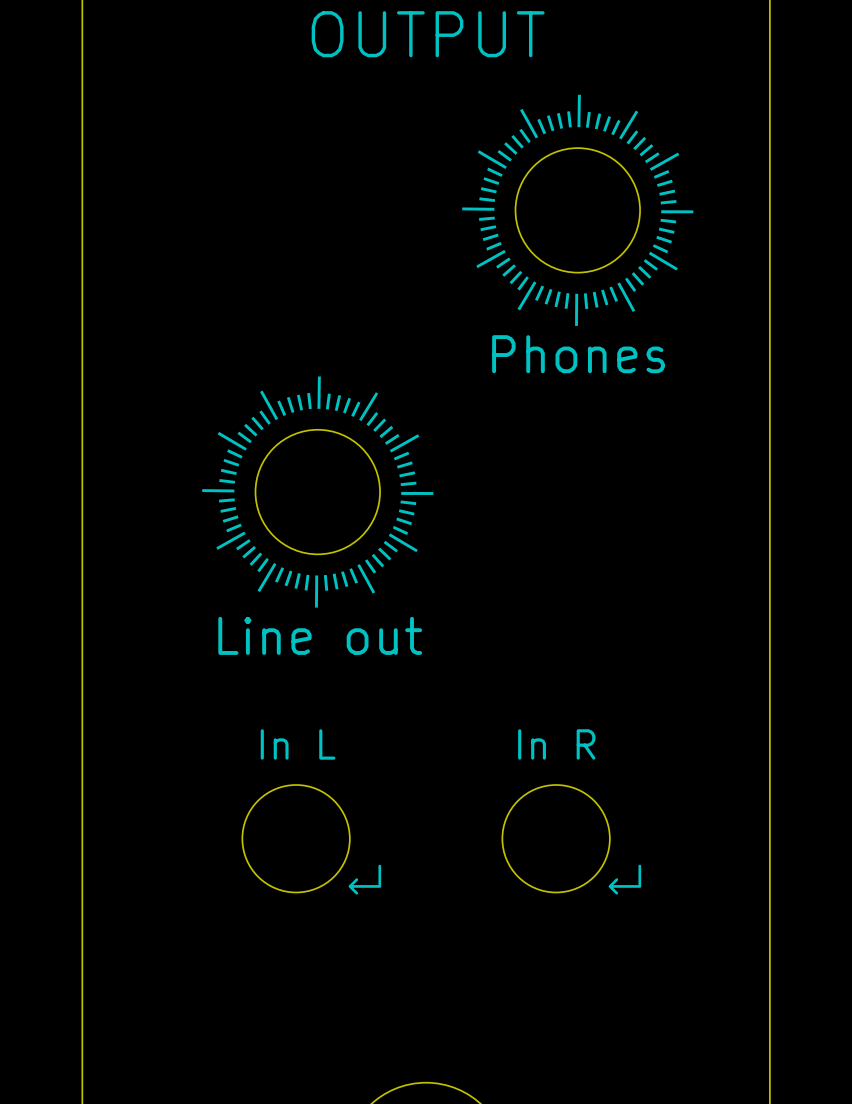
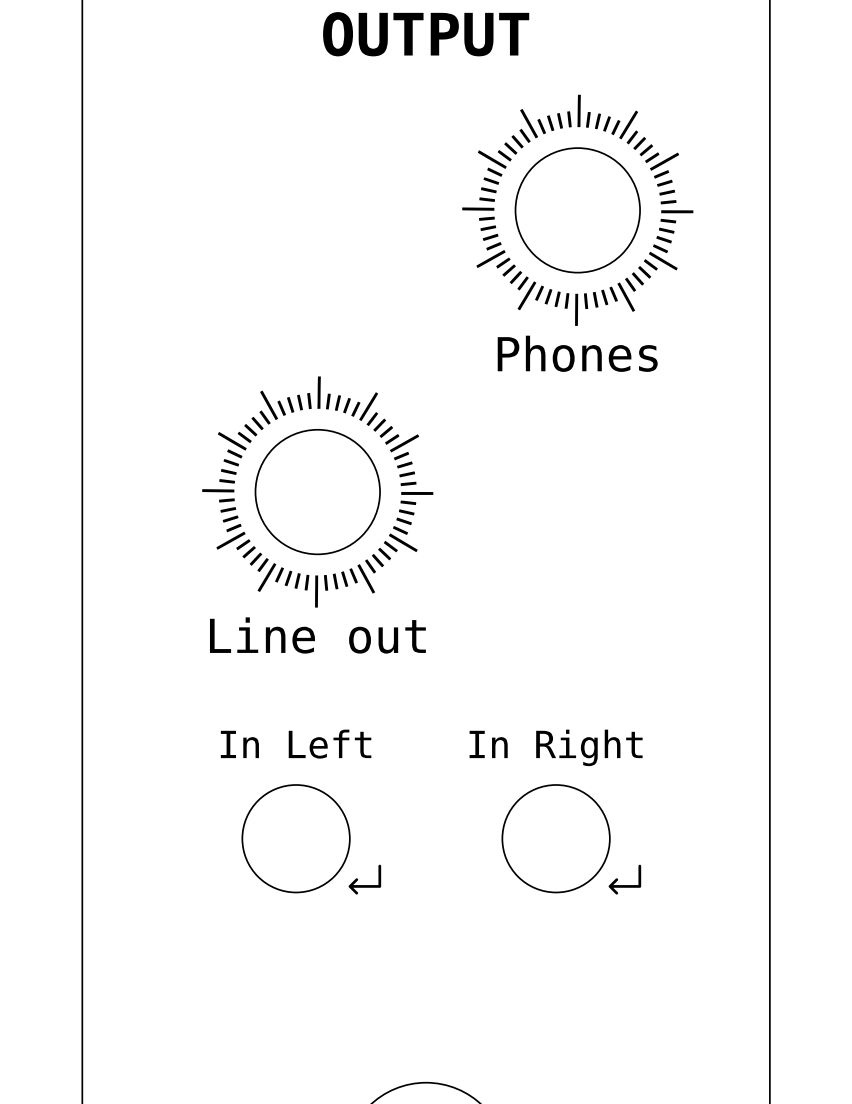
text: In L (298, 744) -> In Left (296, 744)
text: In R (556, 744) -> In Right (556, 747)

